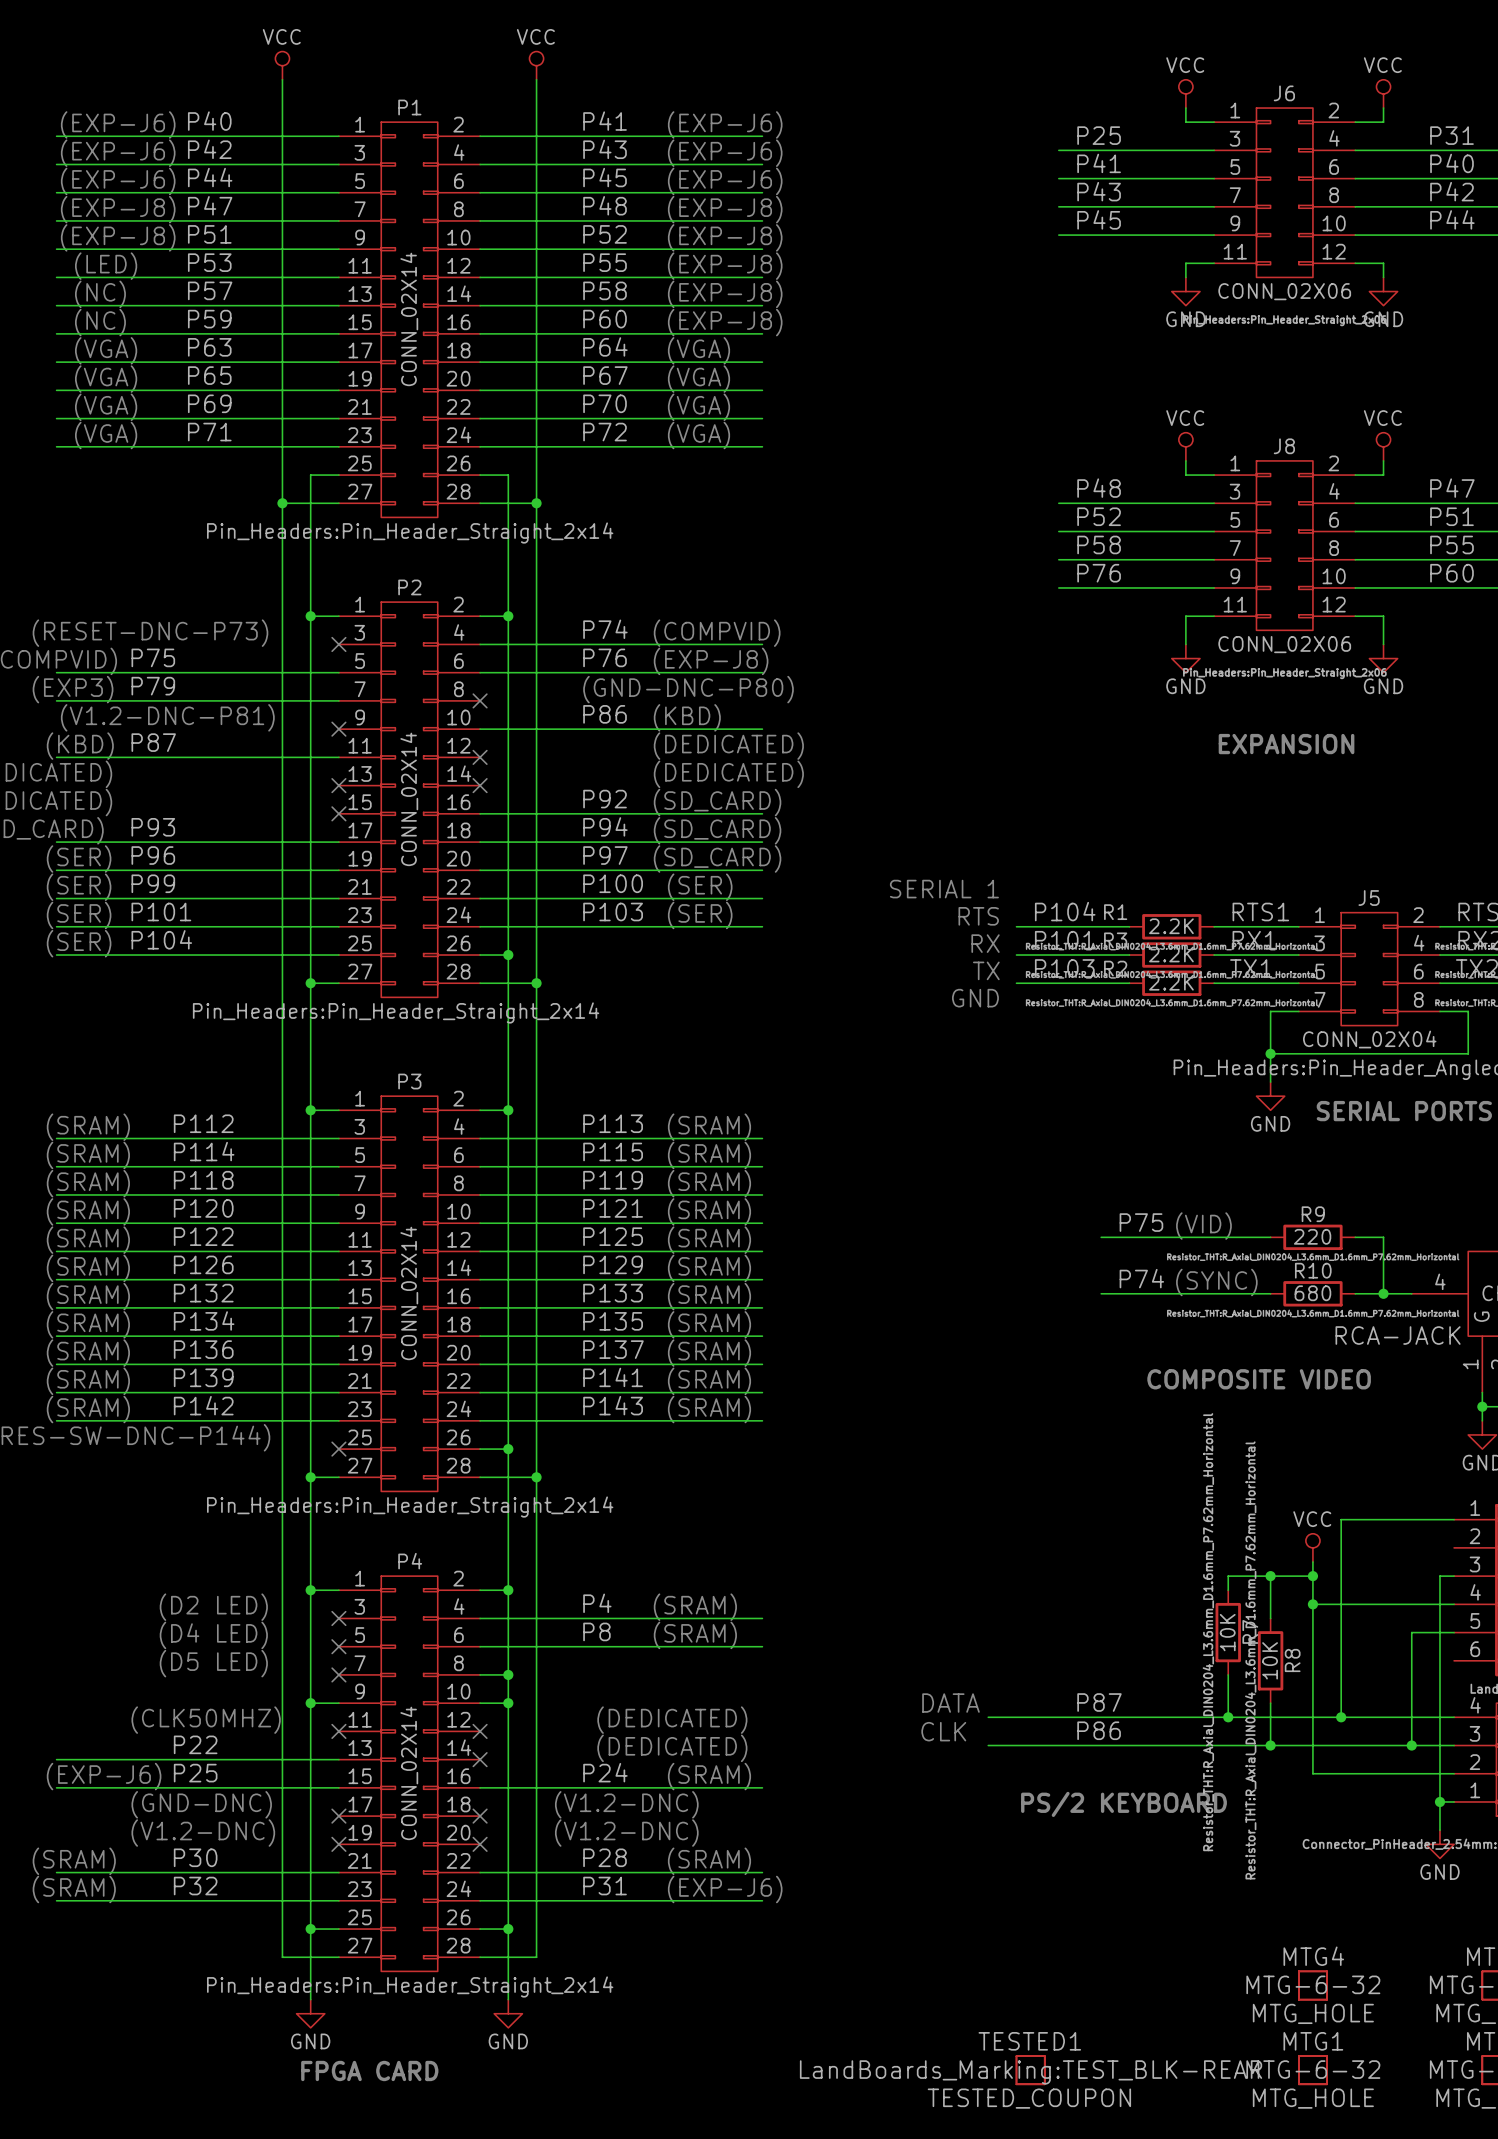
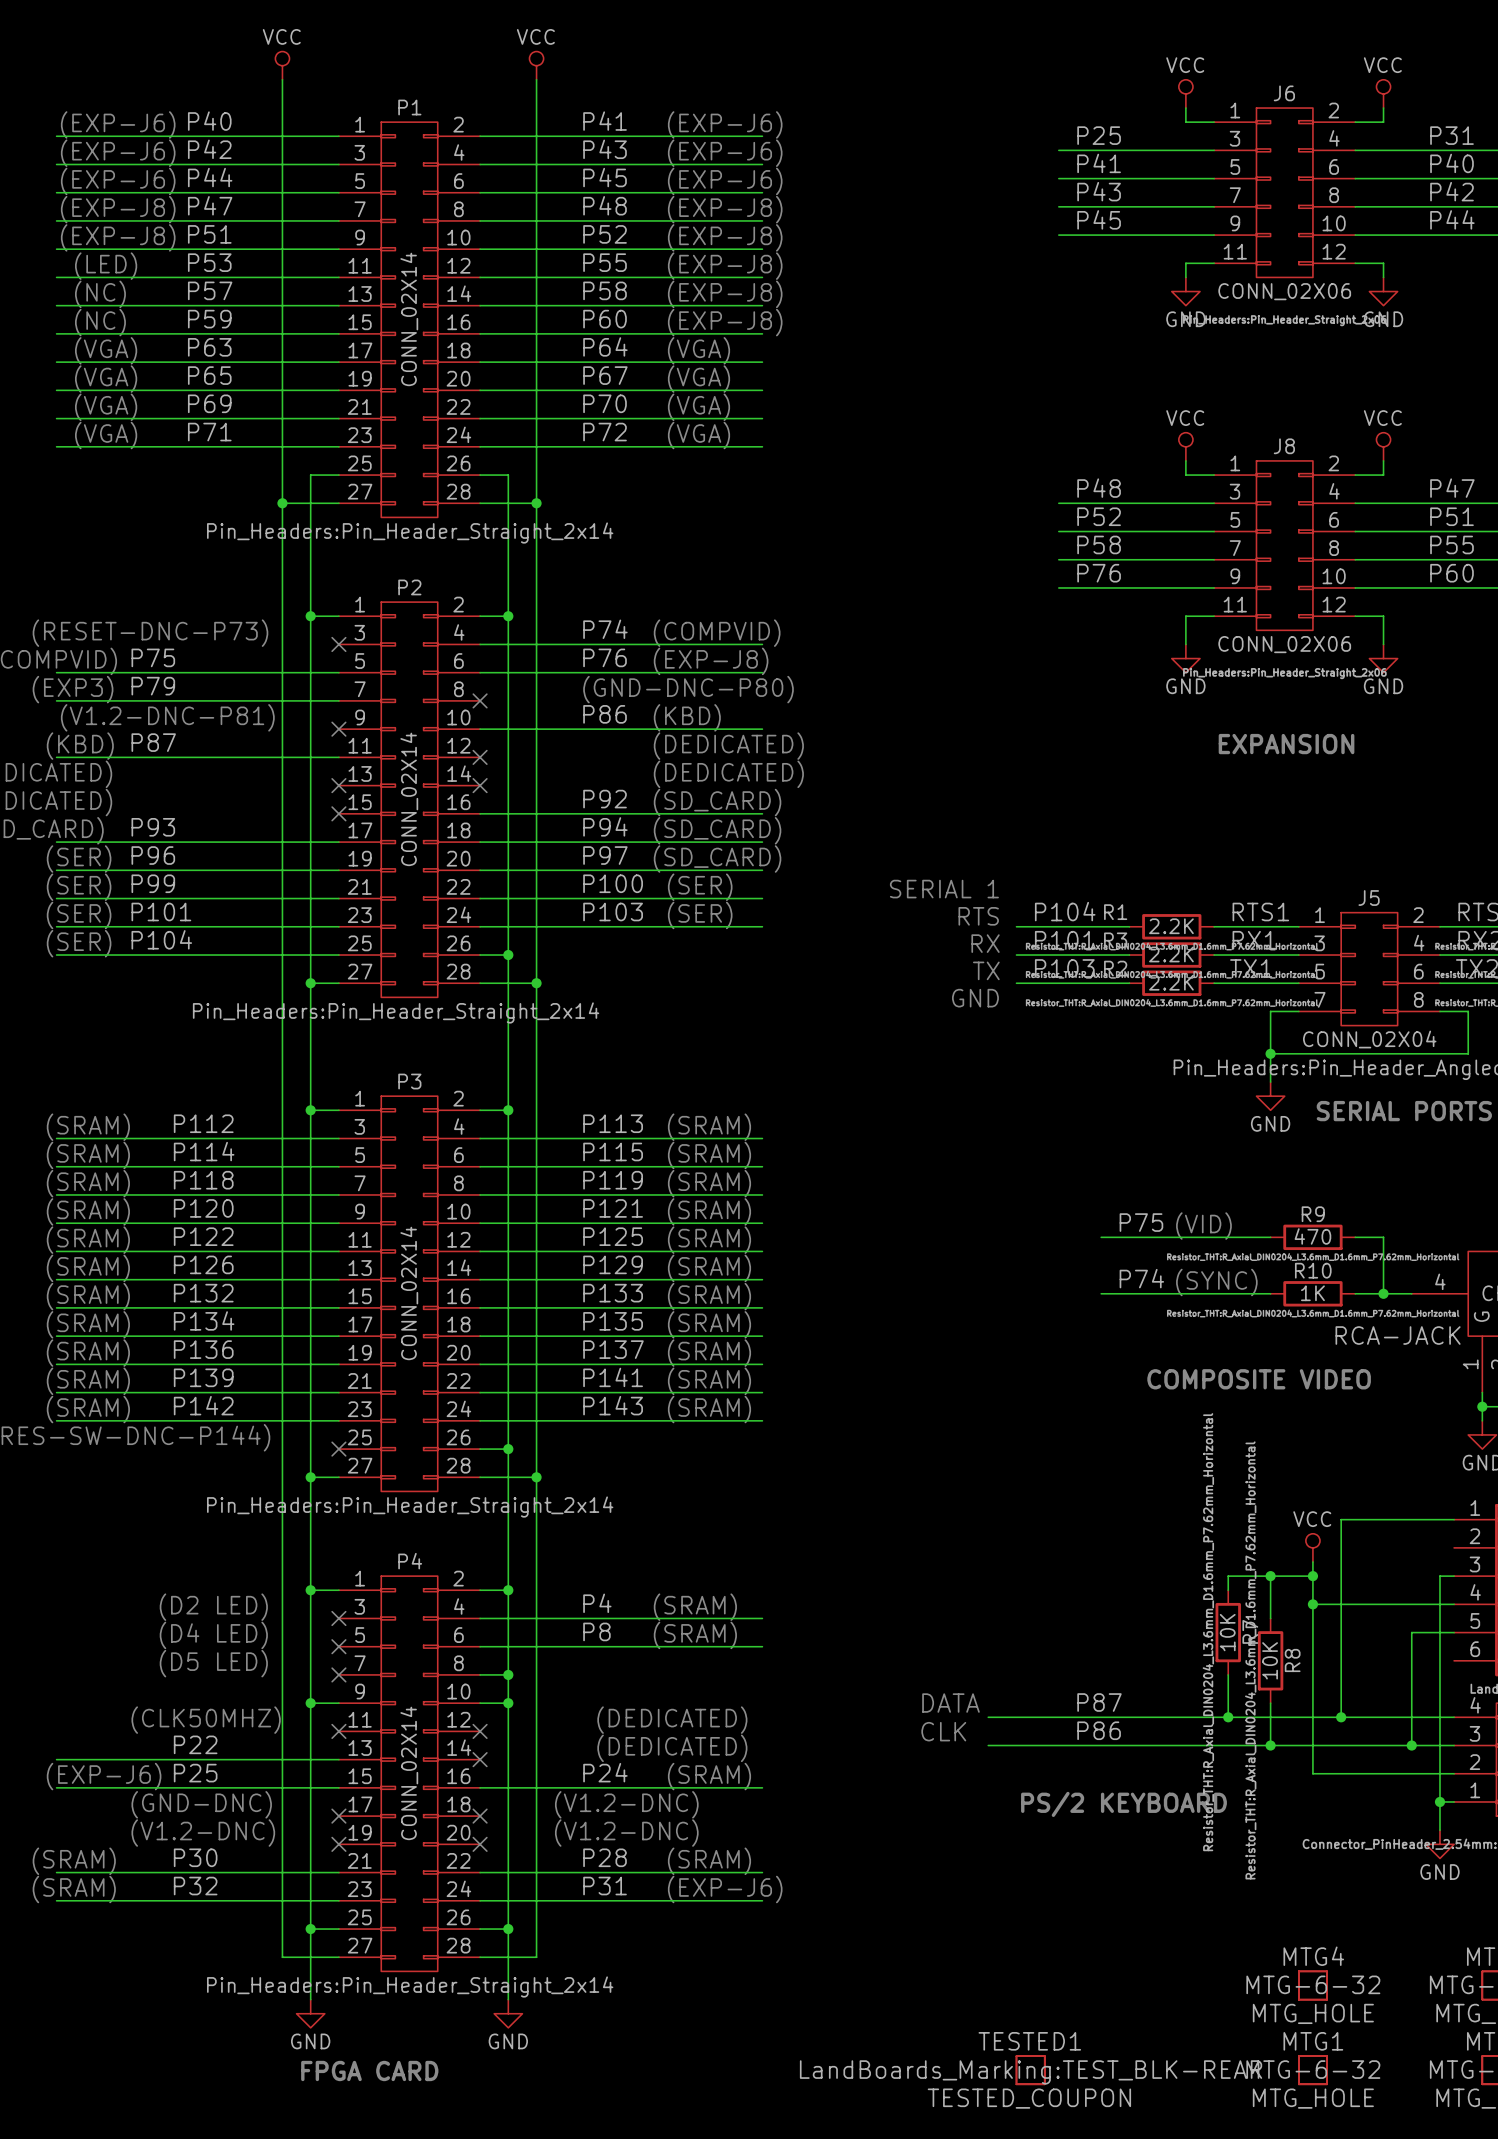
R9 value: 220 (1312, 1236) -> 470 (1312, 1236)
R10 value: 680 (1312, 1293) -> 1K (1312, 1293)

